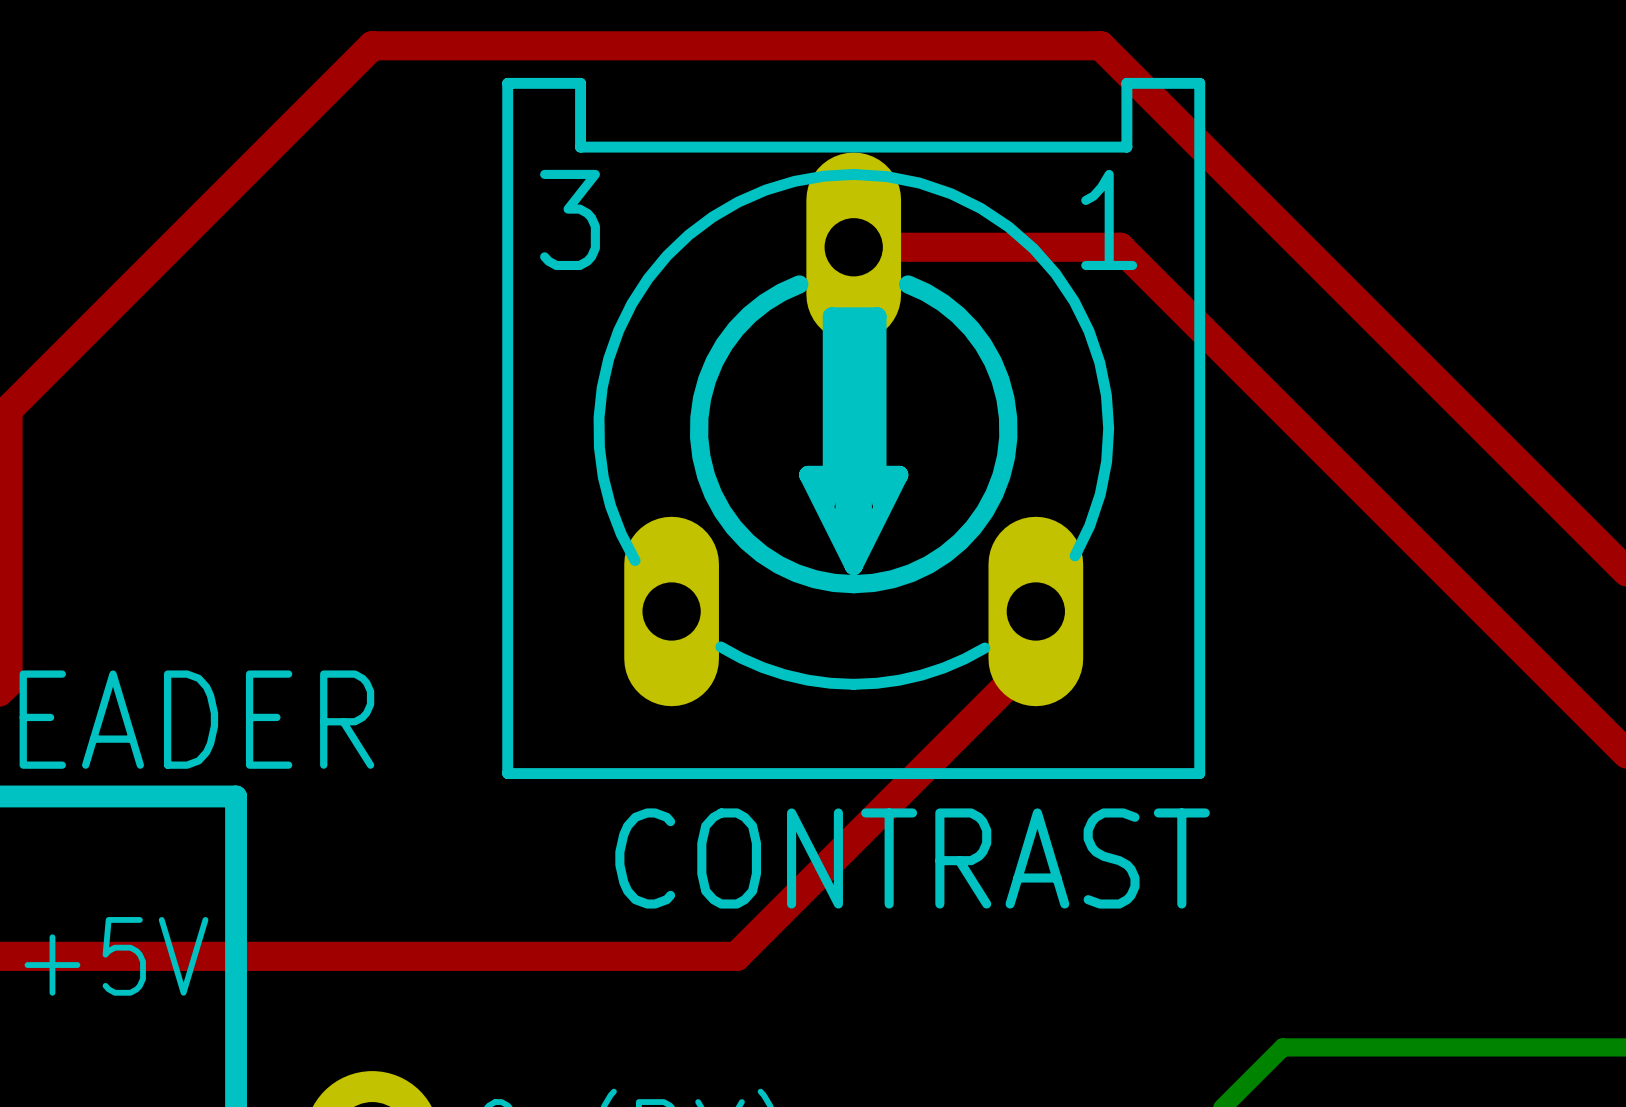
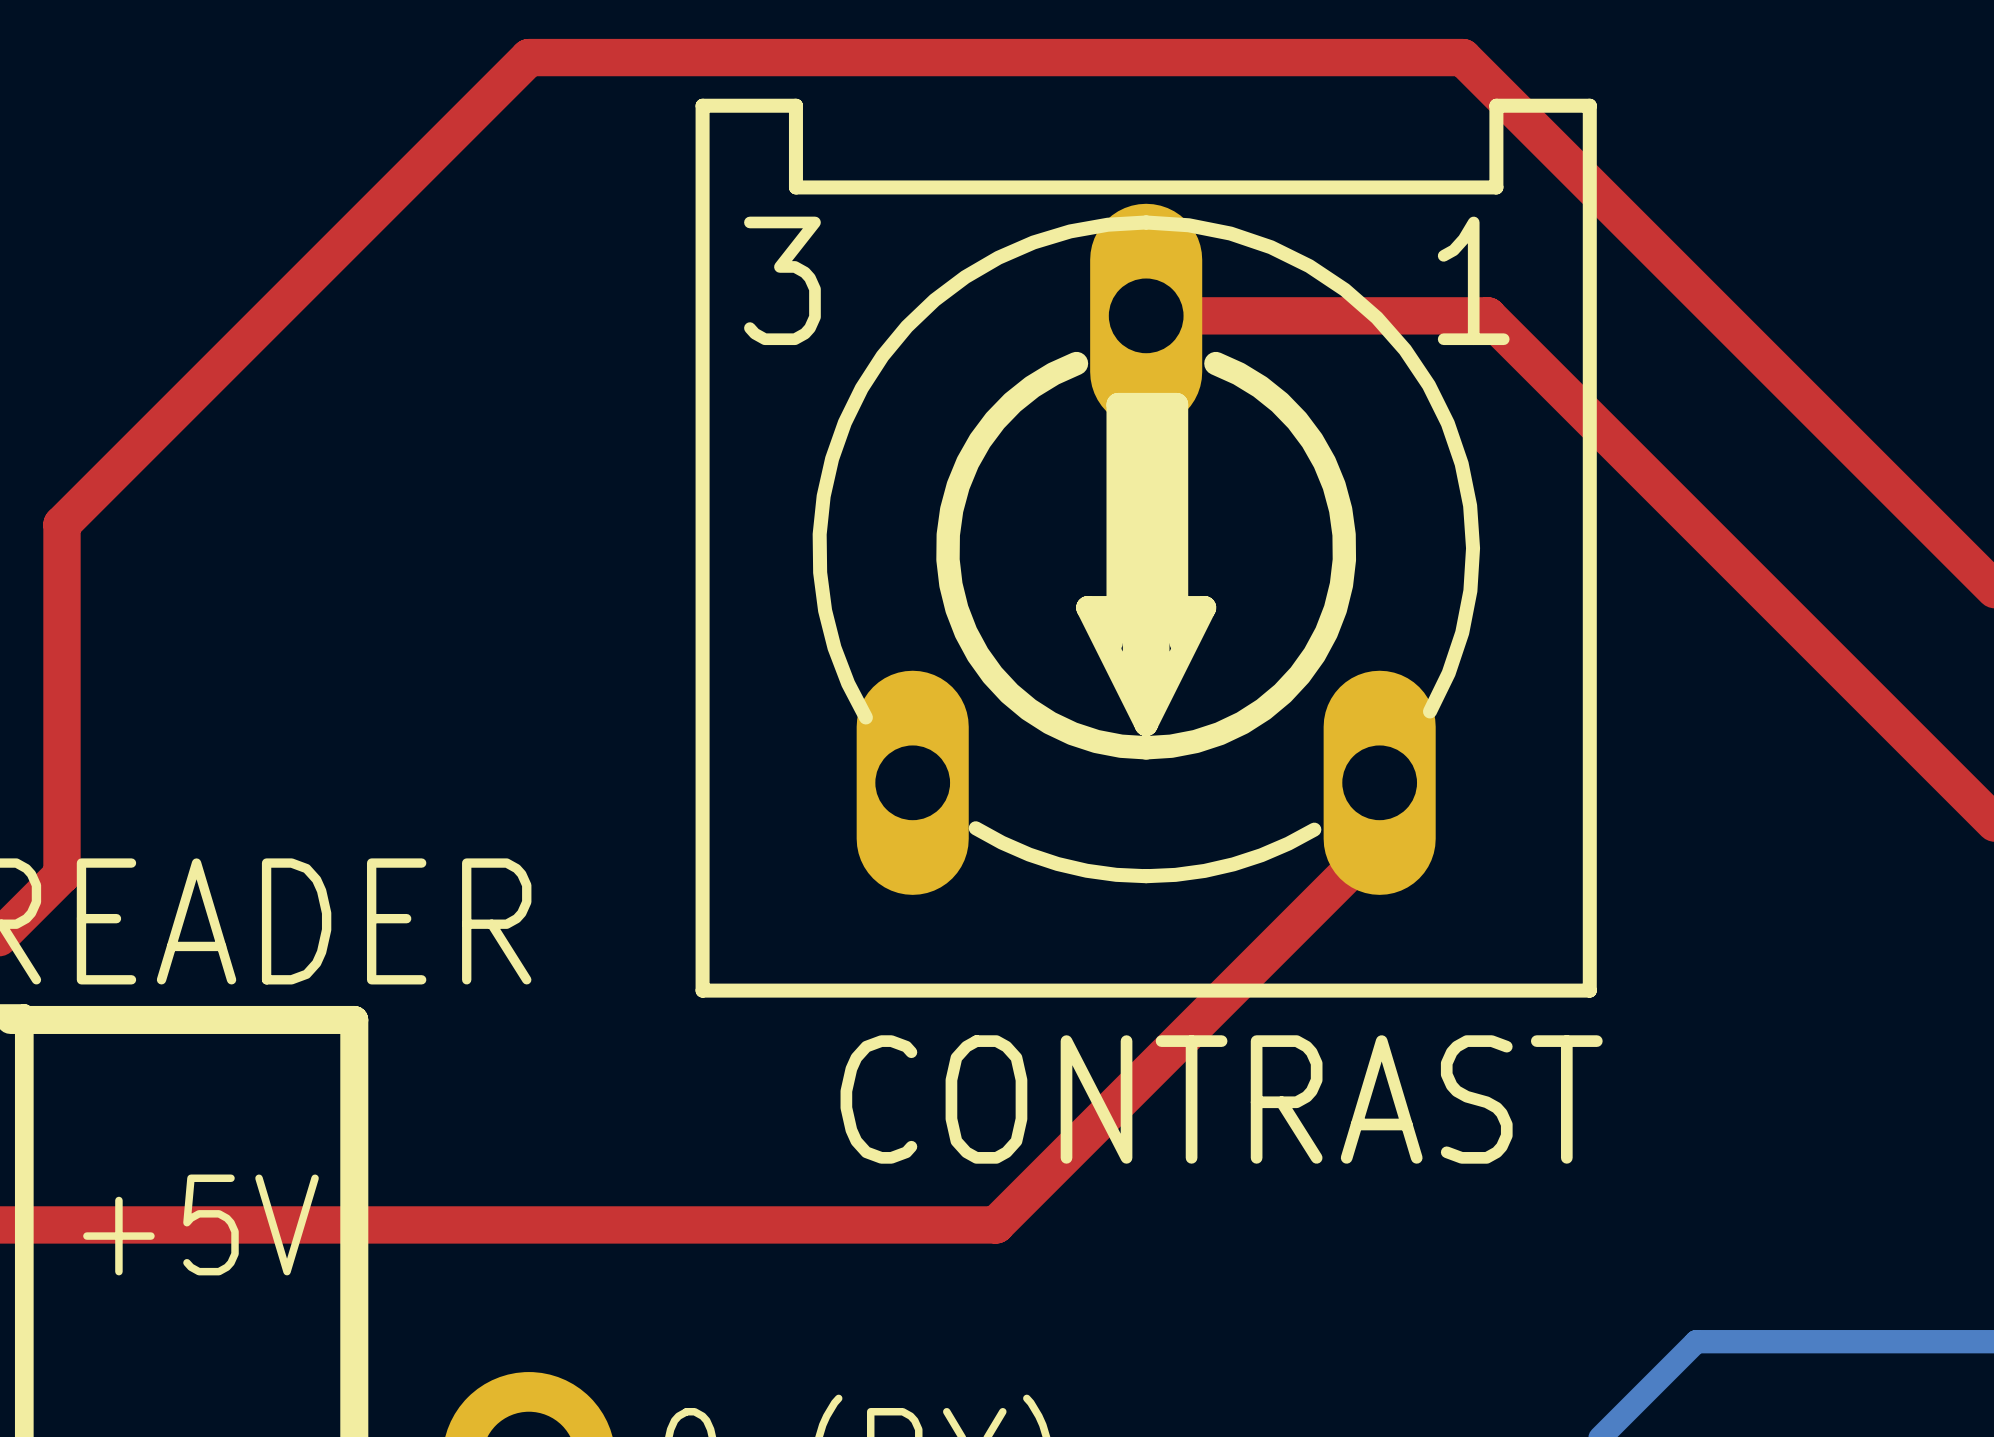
CONTRAST footprint: [502, 77, 1206, 780] -> [695, 98, 1597, 998]

